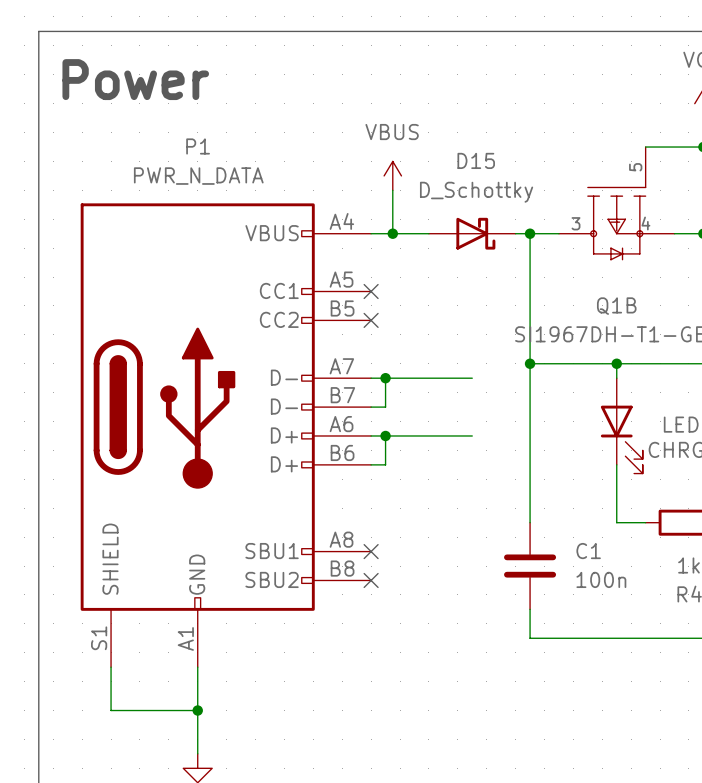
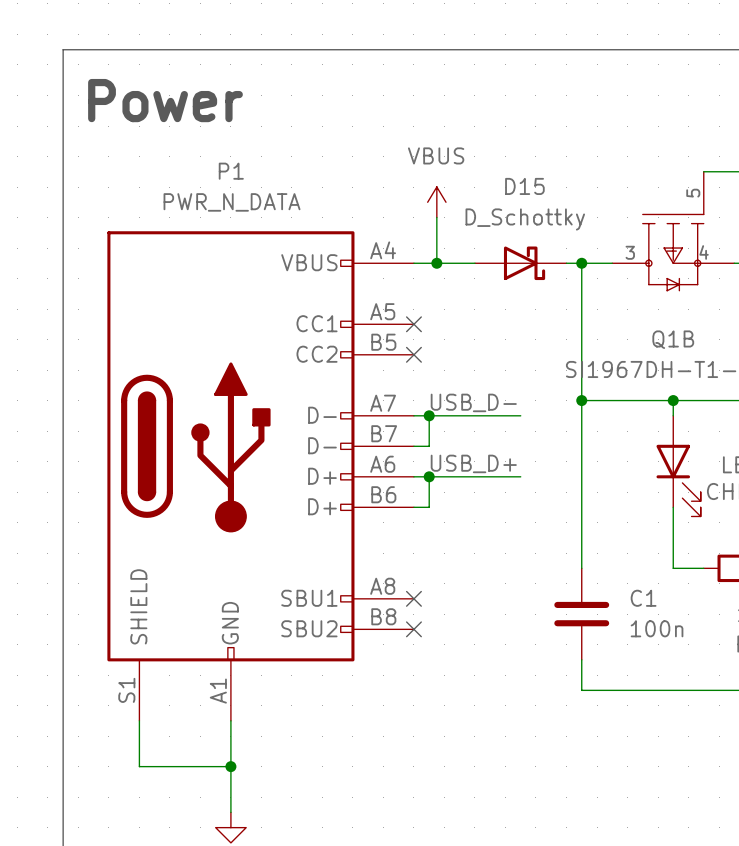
label: none -> USB_D- (473, 402)
label: none -> USB_D+ (473, 463)

